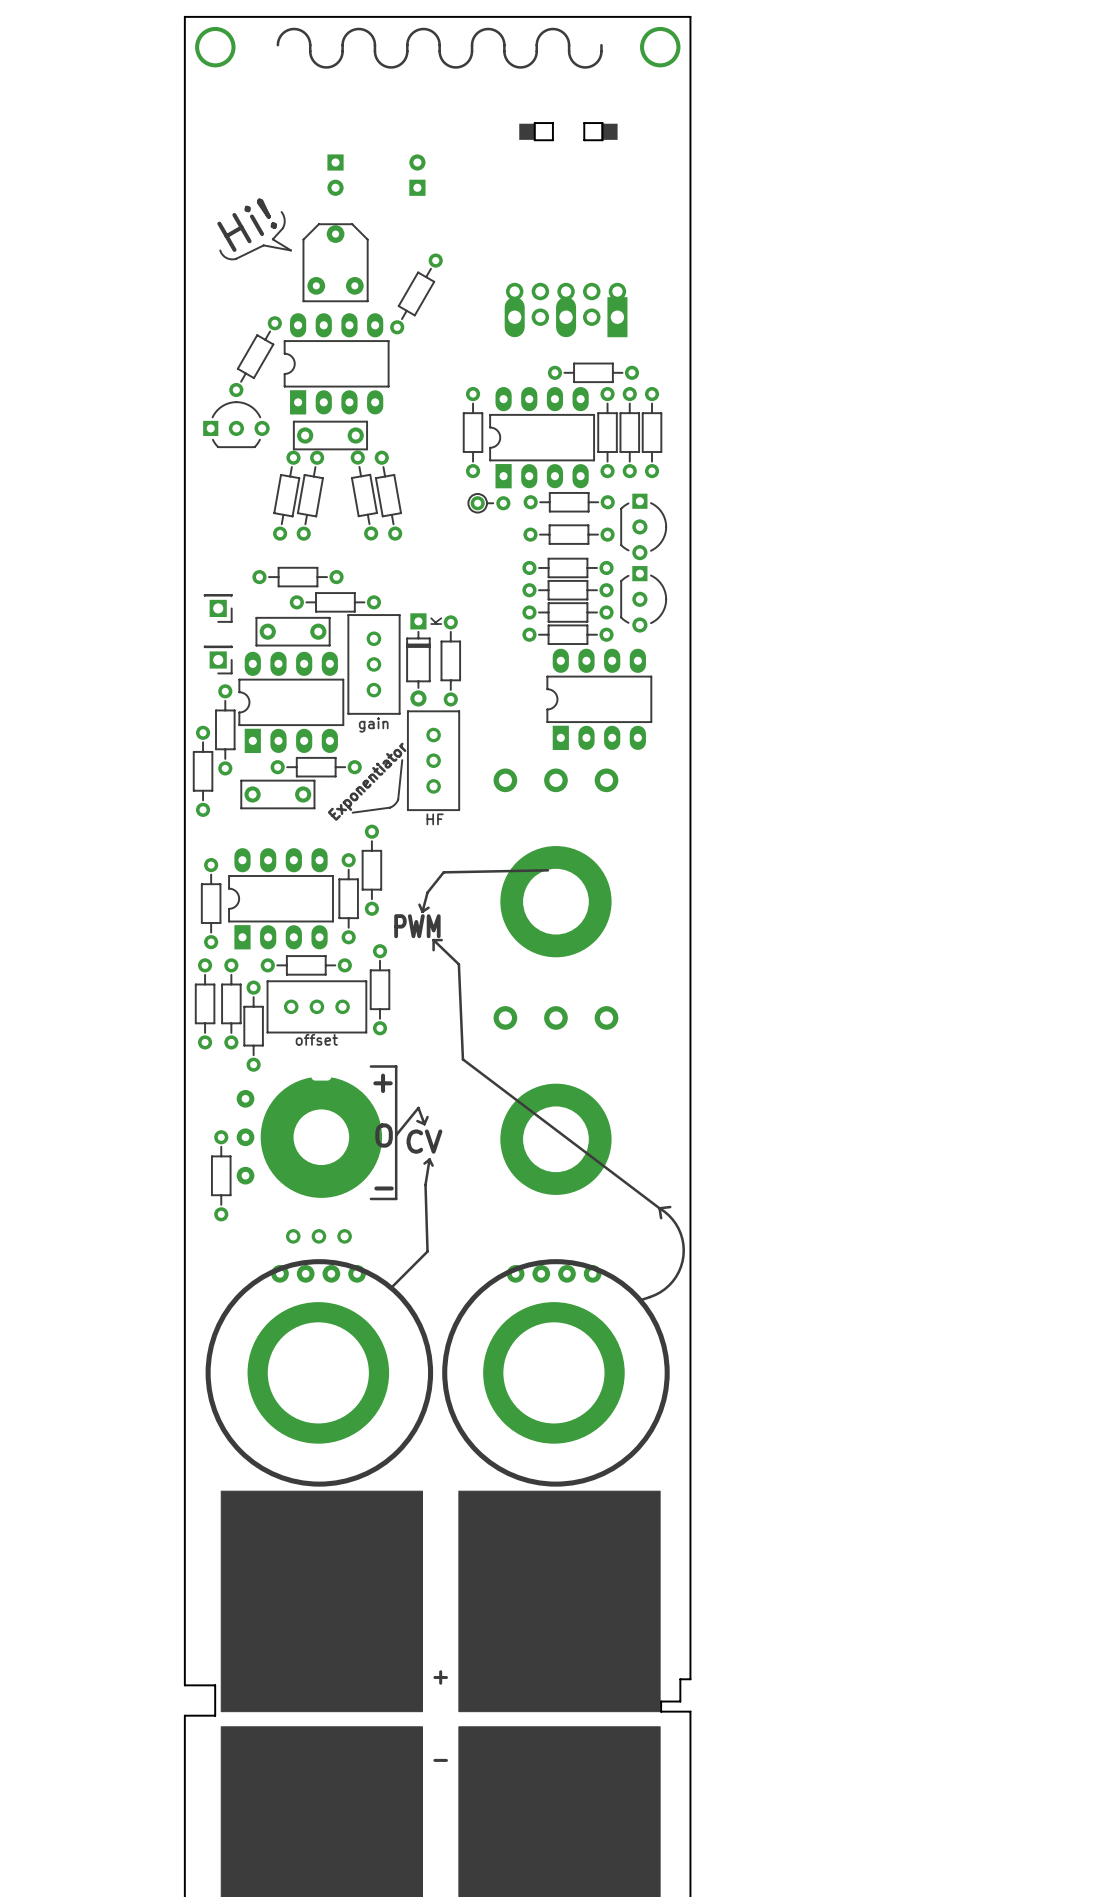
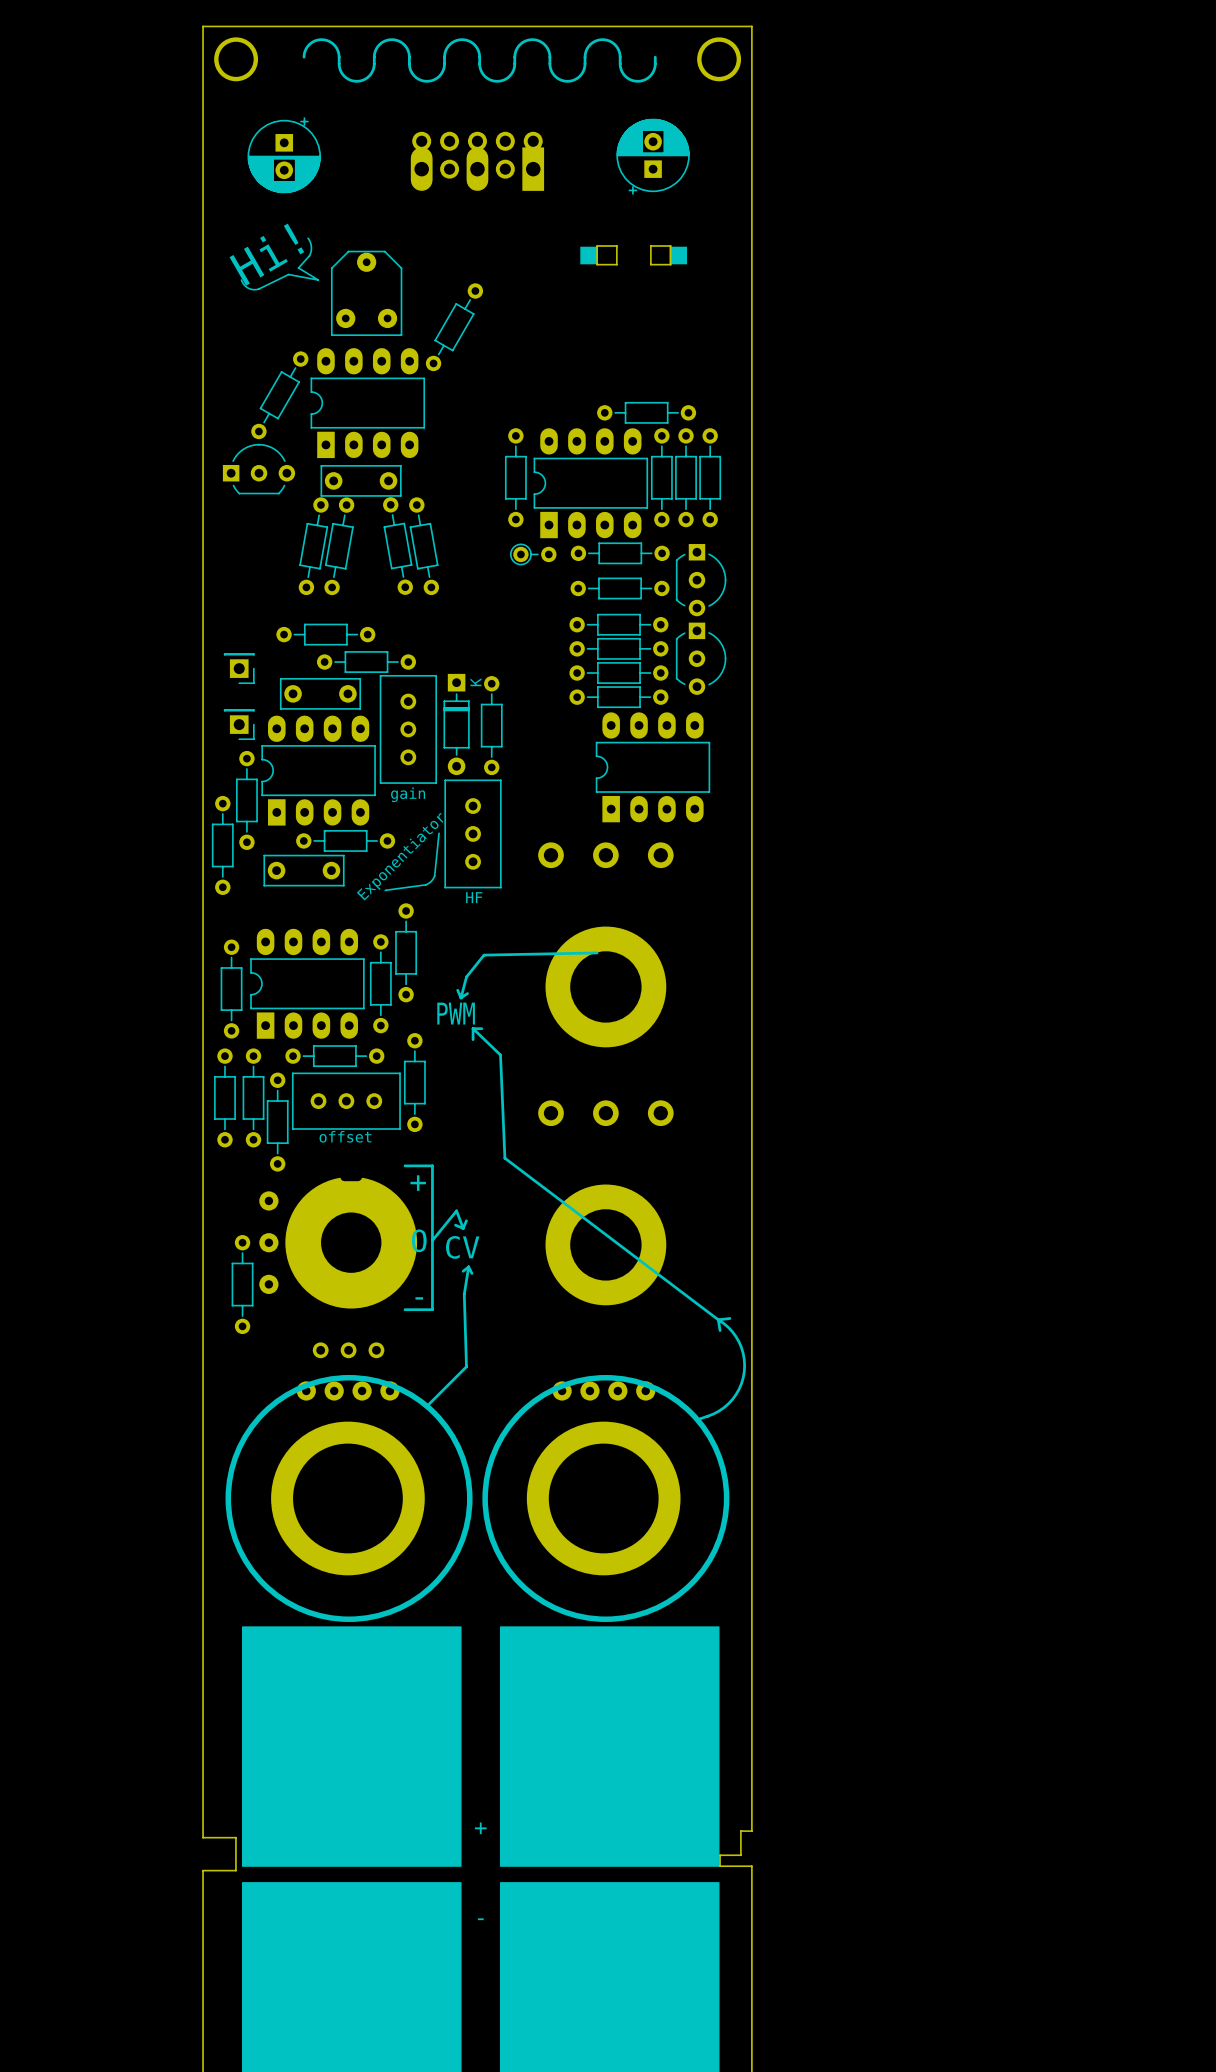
drawing position: (568, 131) -> (633, 255)
part side: bottom (335, 175) -> top (284, 155)
part side: bottom (417, 175) -> top (653, 156)
part position: (566, 310) -> (477, 161)

